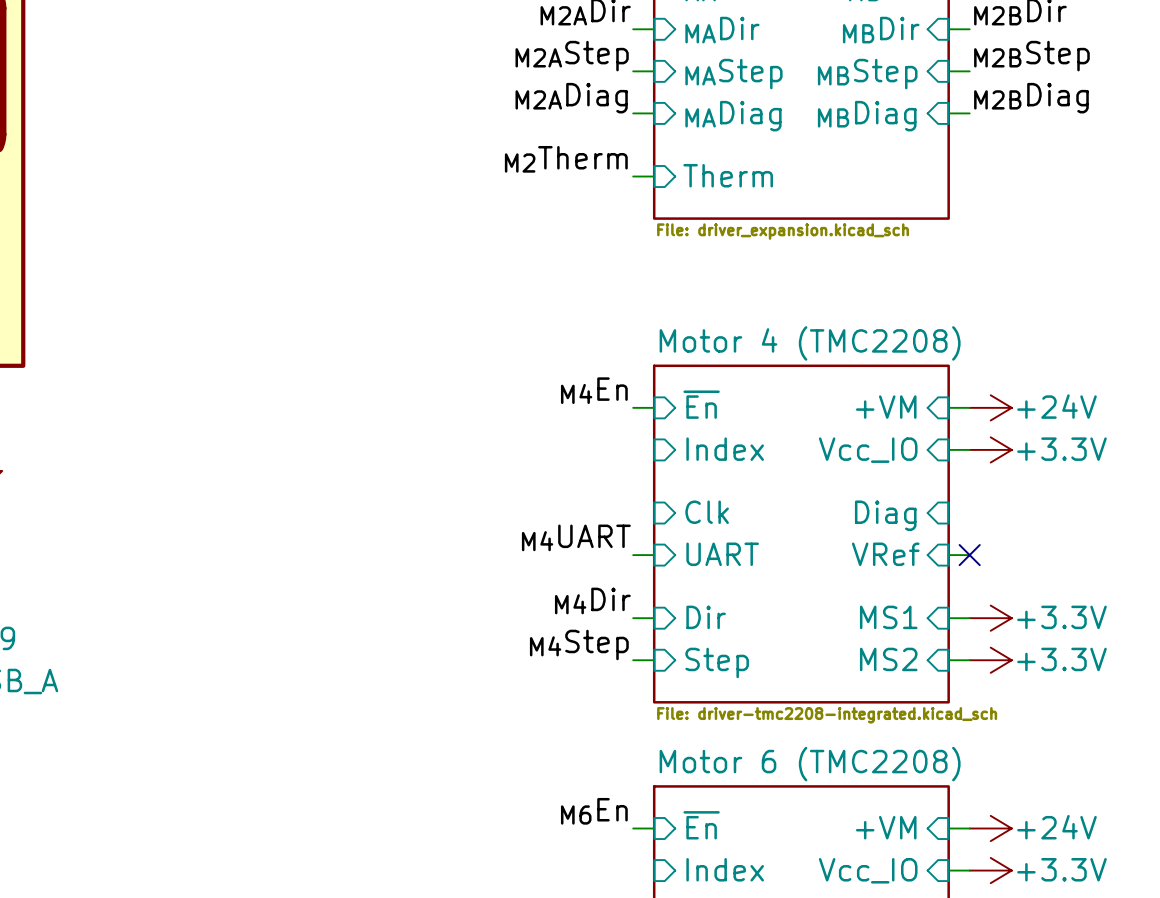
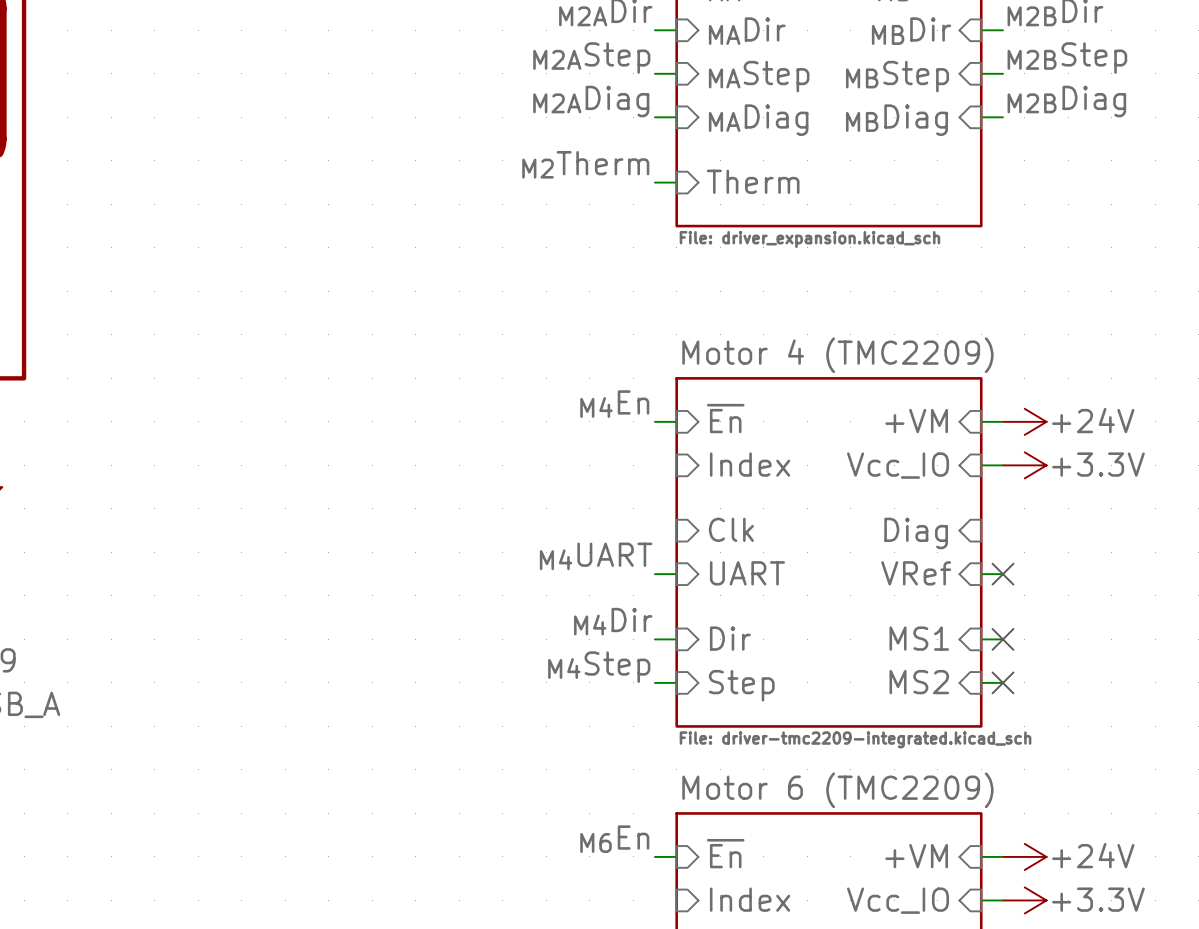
sheet Motor 4 (TMC2208) name: Motor 4 (TMC2208) (810, 343) -> Motor 4 (TMC2209) (837, 355)
no-connect mark: none -> (1002, 639)
power symbol: +3.3V (990, 618) -> none
no-connect mark: none -> (1002, 682)
power symbol: +3.3V (990, 660) -> none
sheet Motor 4 (TMC2208) value: File: driver-tmc2208-integrated.kicad_sch (827, 715) -> File: driver-tmc2209-integrated.kicad_sch (855, 739)
sheet Motor 6 (TMC2208) name: Motor 6 (TMC2208) (810, 764) -> Motor 6 (TMC2209) (837, 790)

